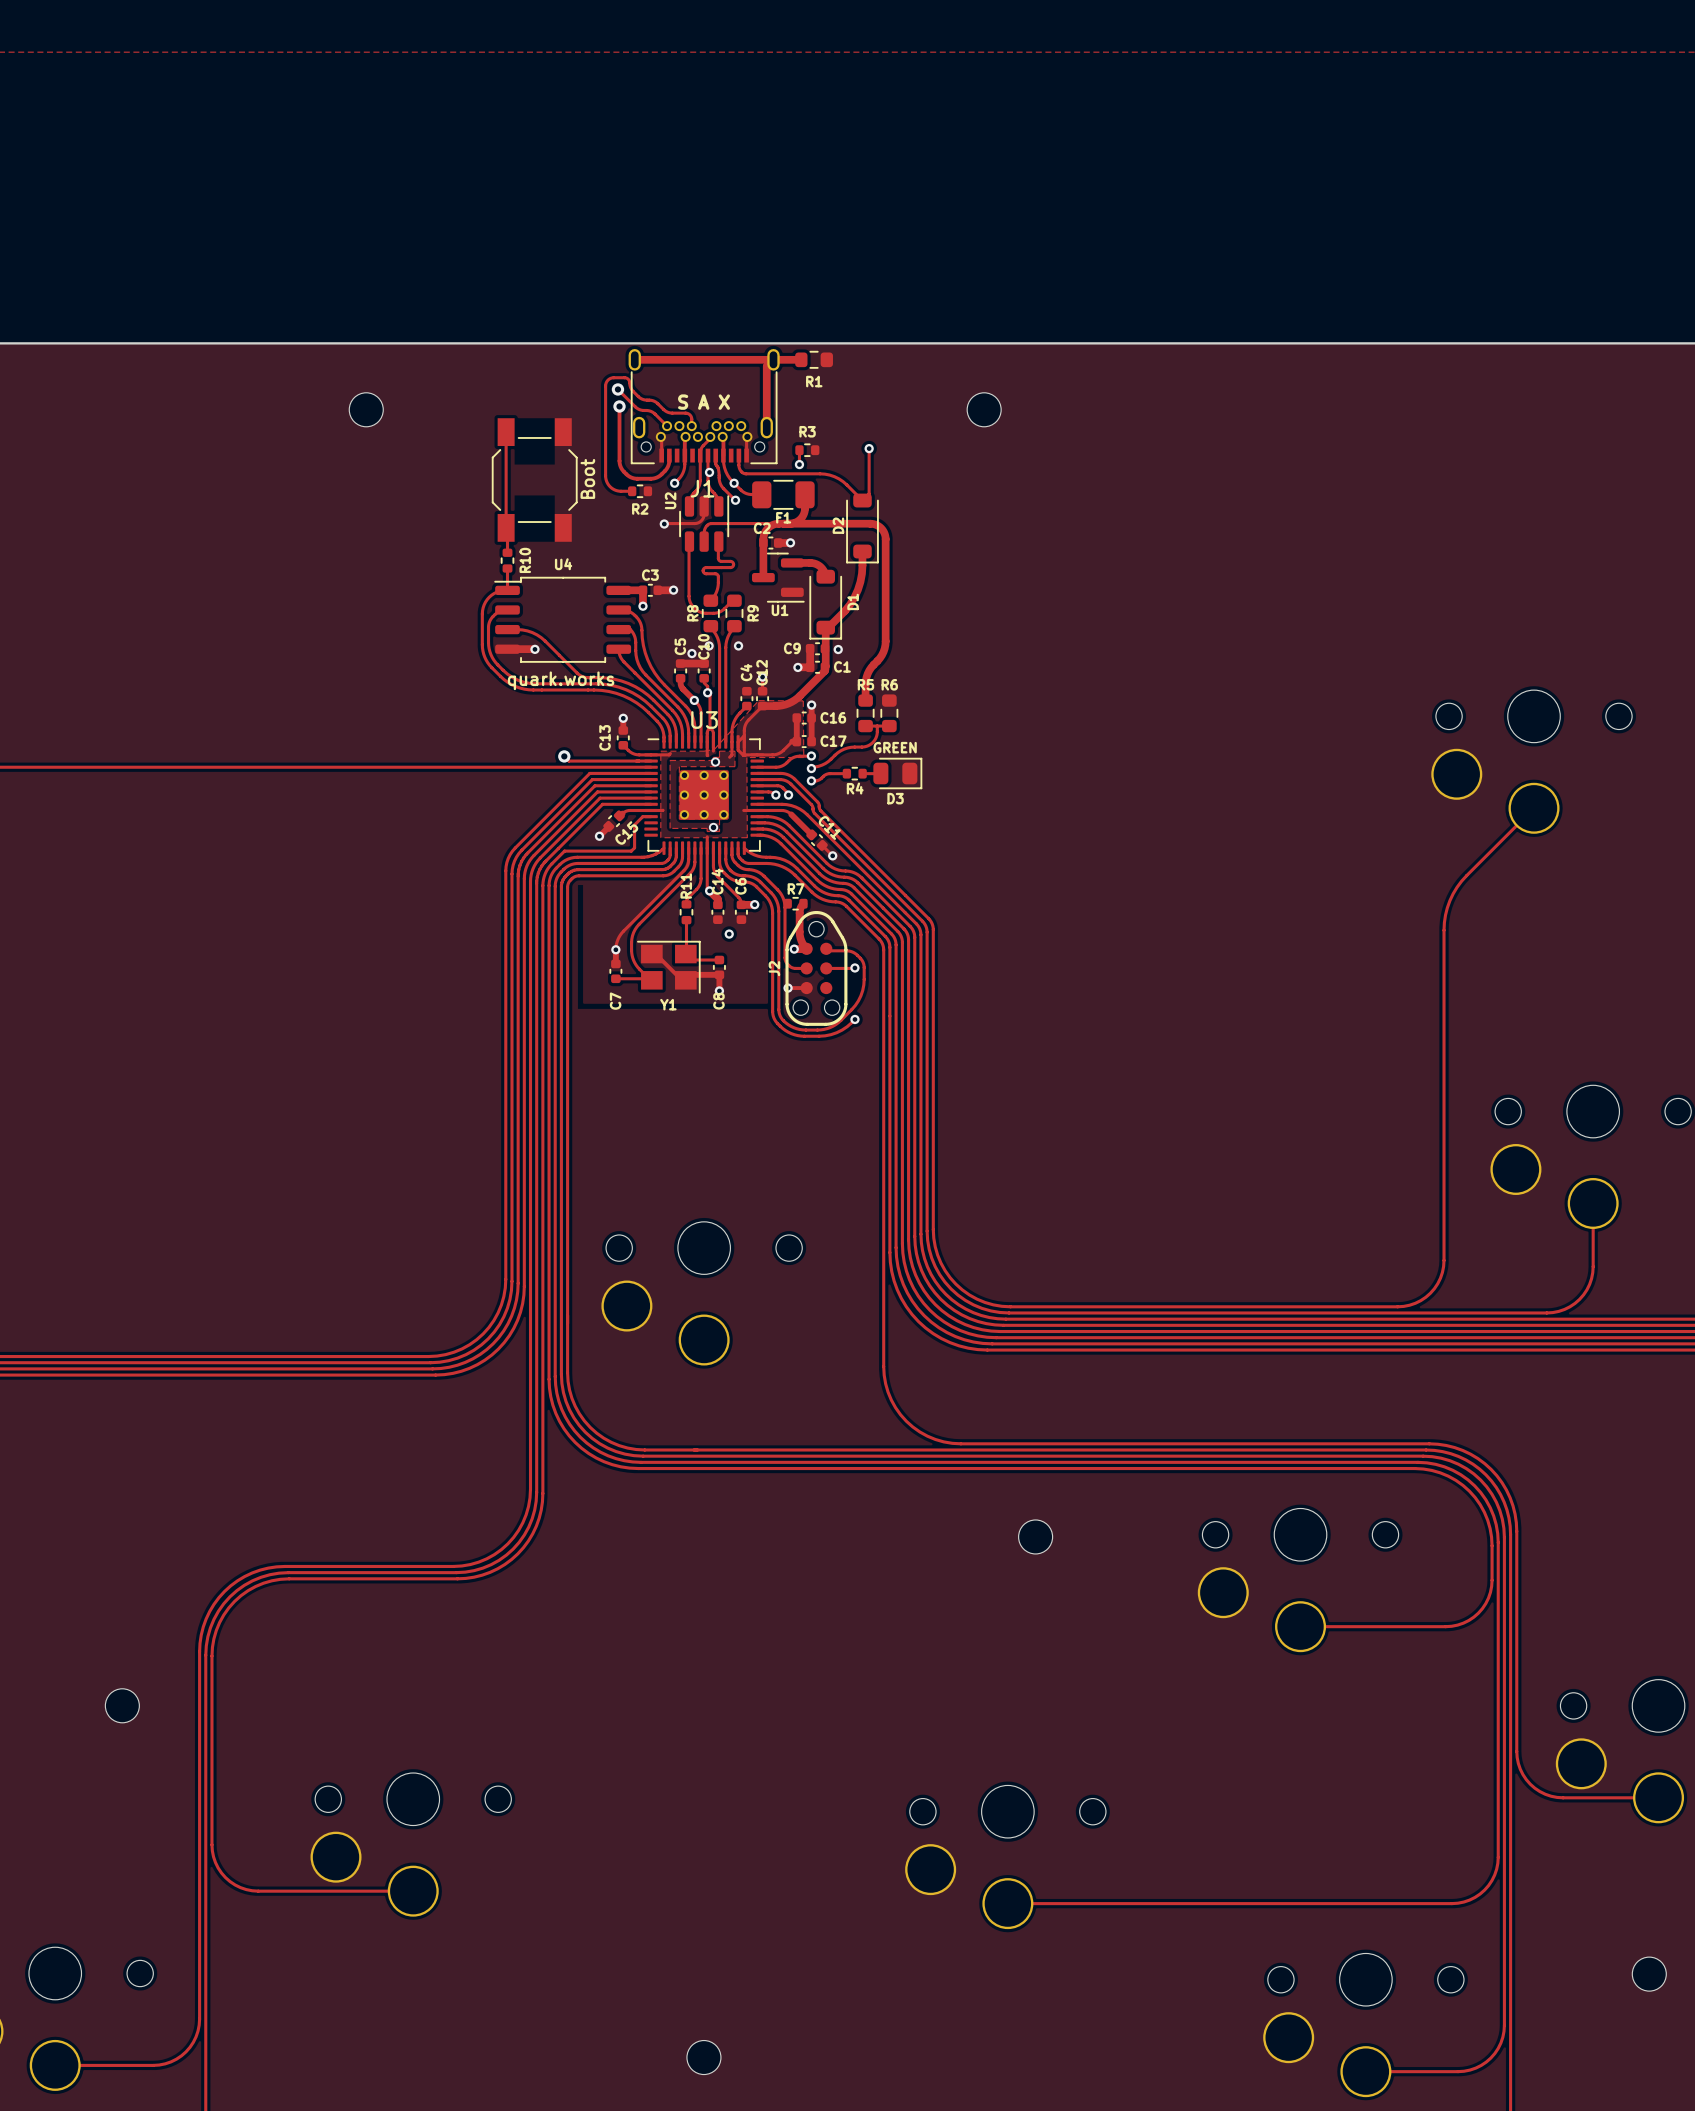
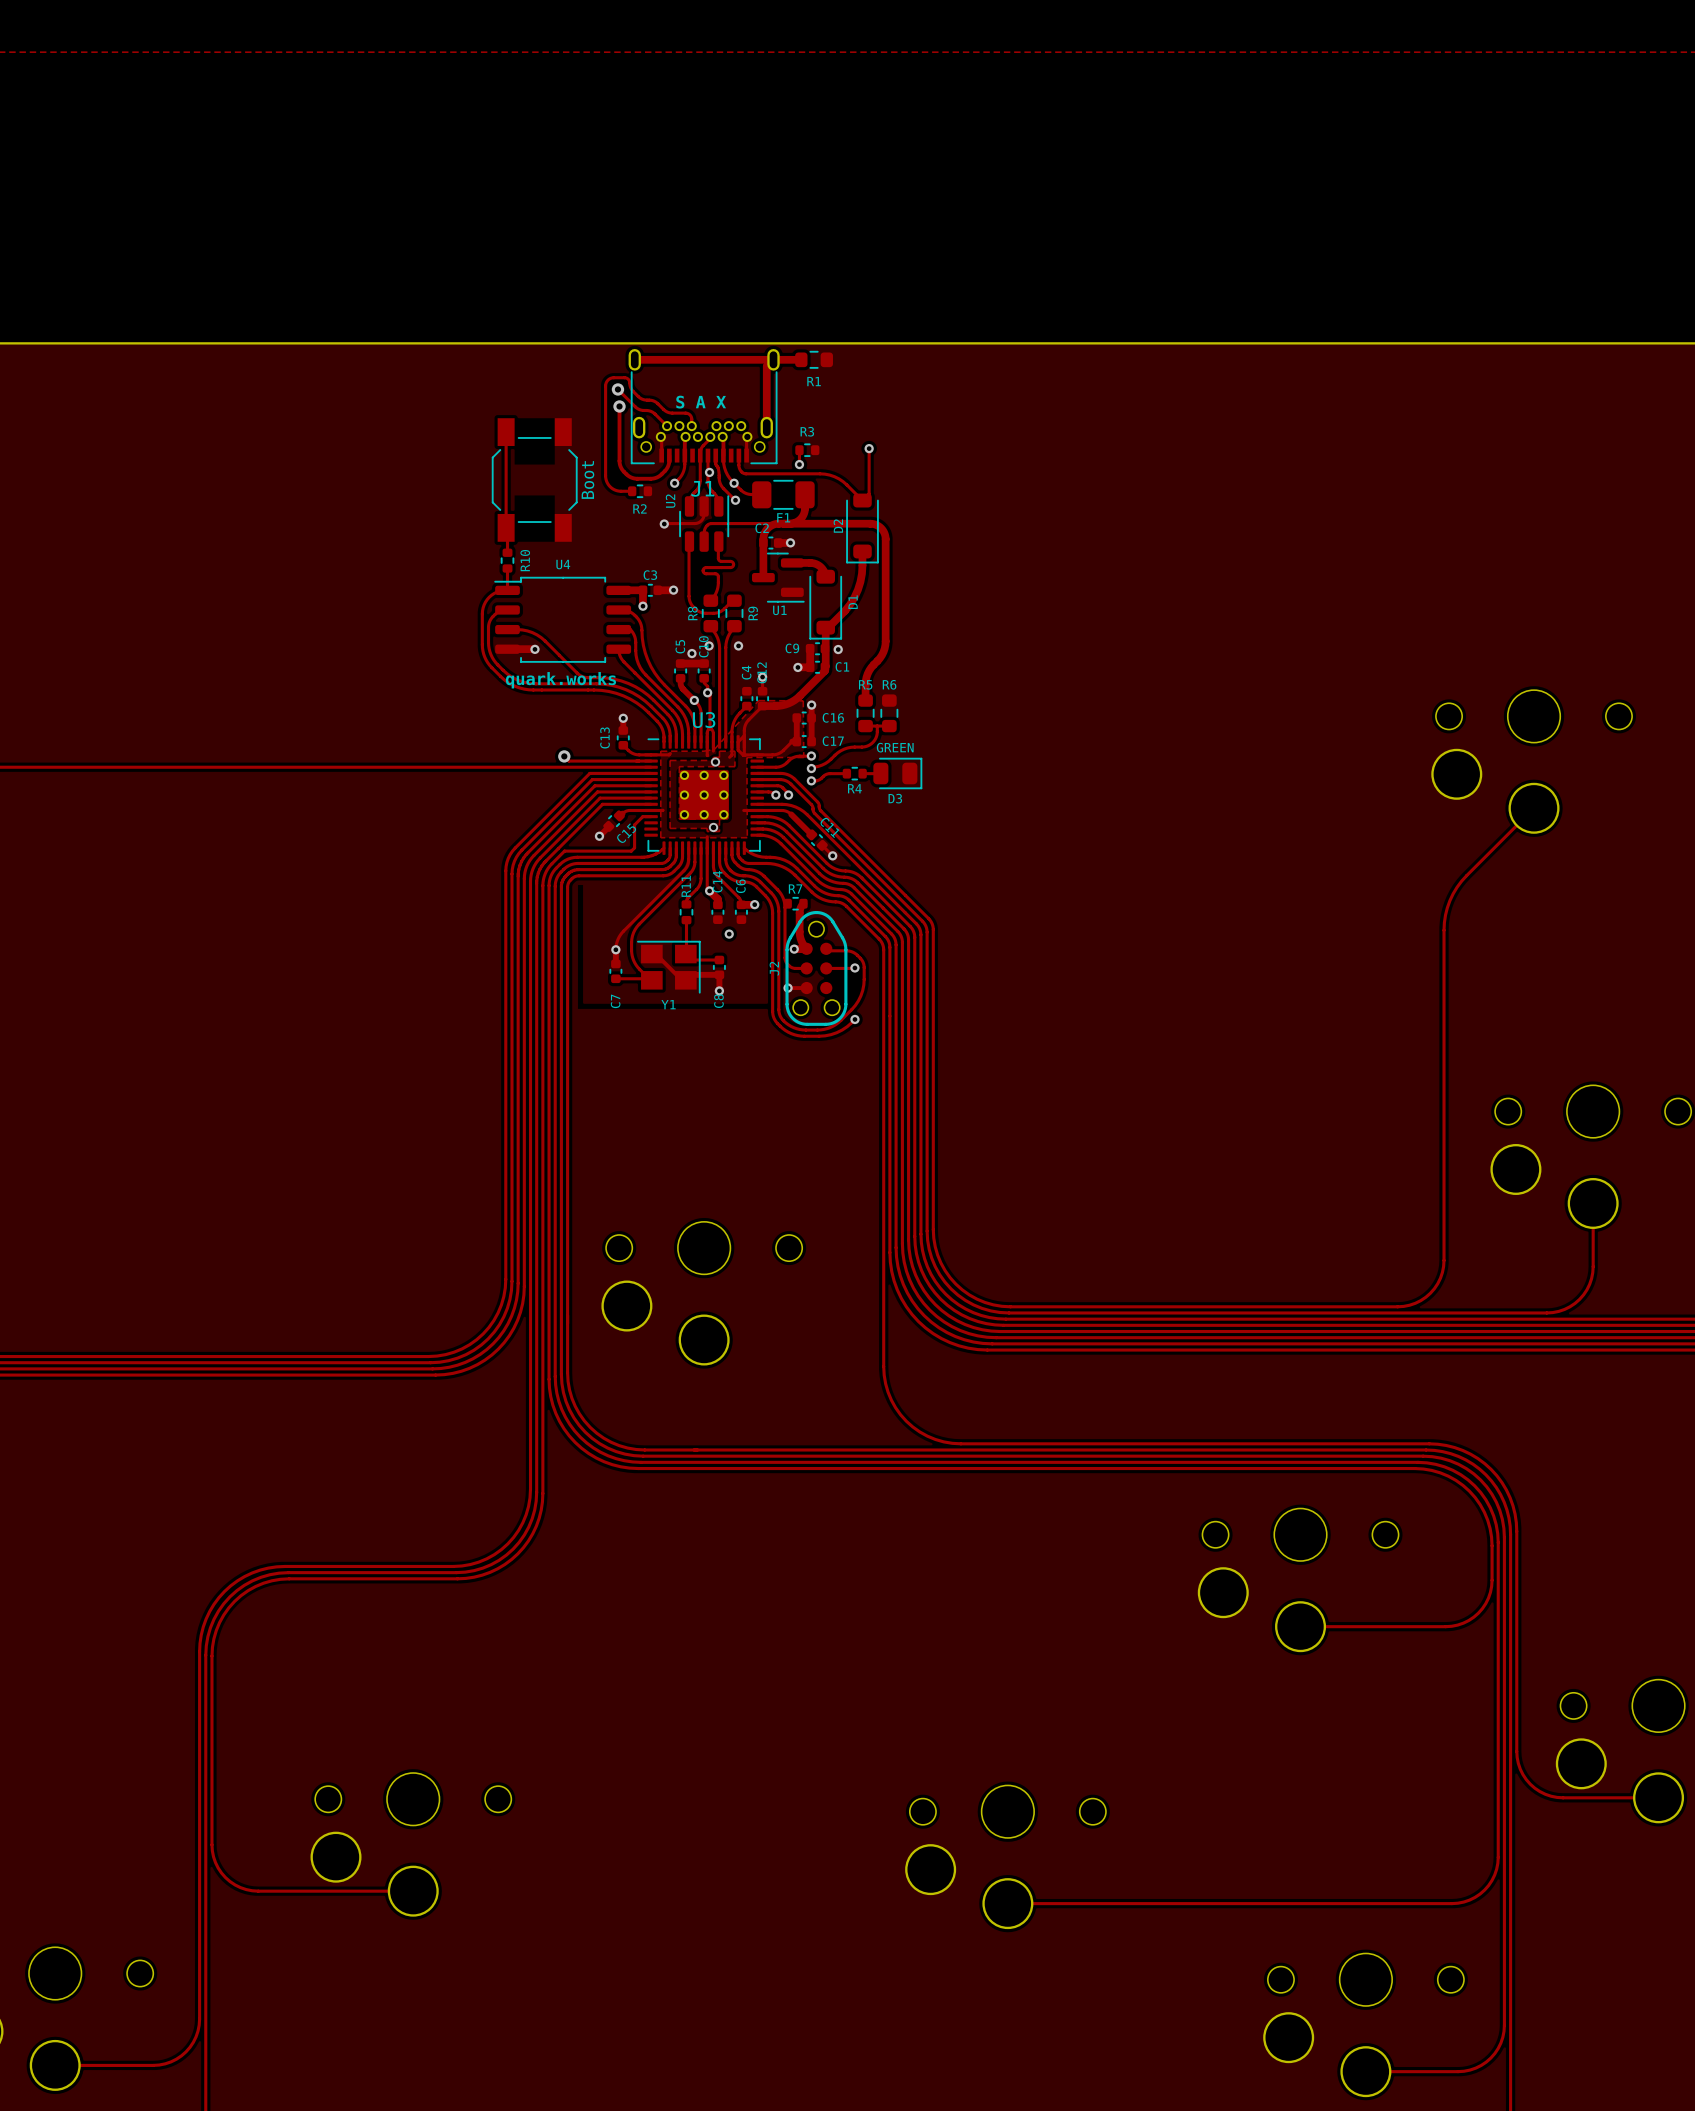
part: (366, 409) -> none
part: (984, 409) -> none
part: (1035, 1536) -> none
part: (122, 1705) -> none
part: (1649, 1974) -> none
part: (703, 2057) -> none

